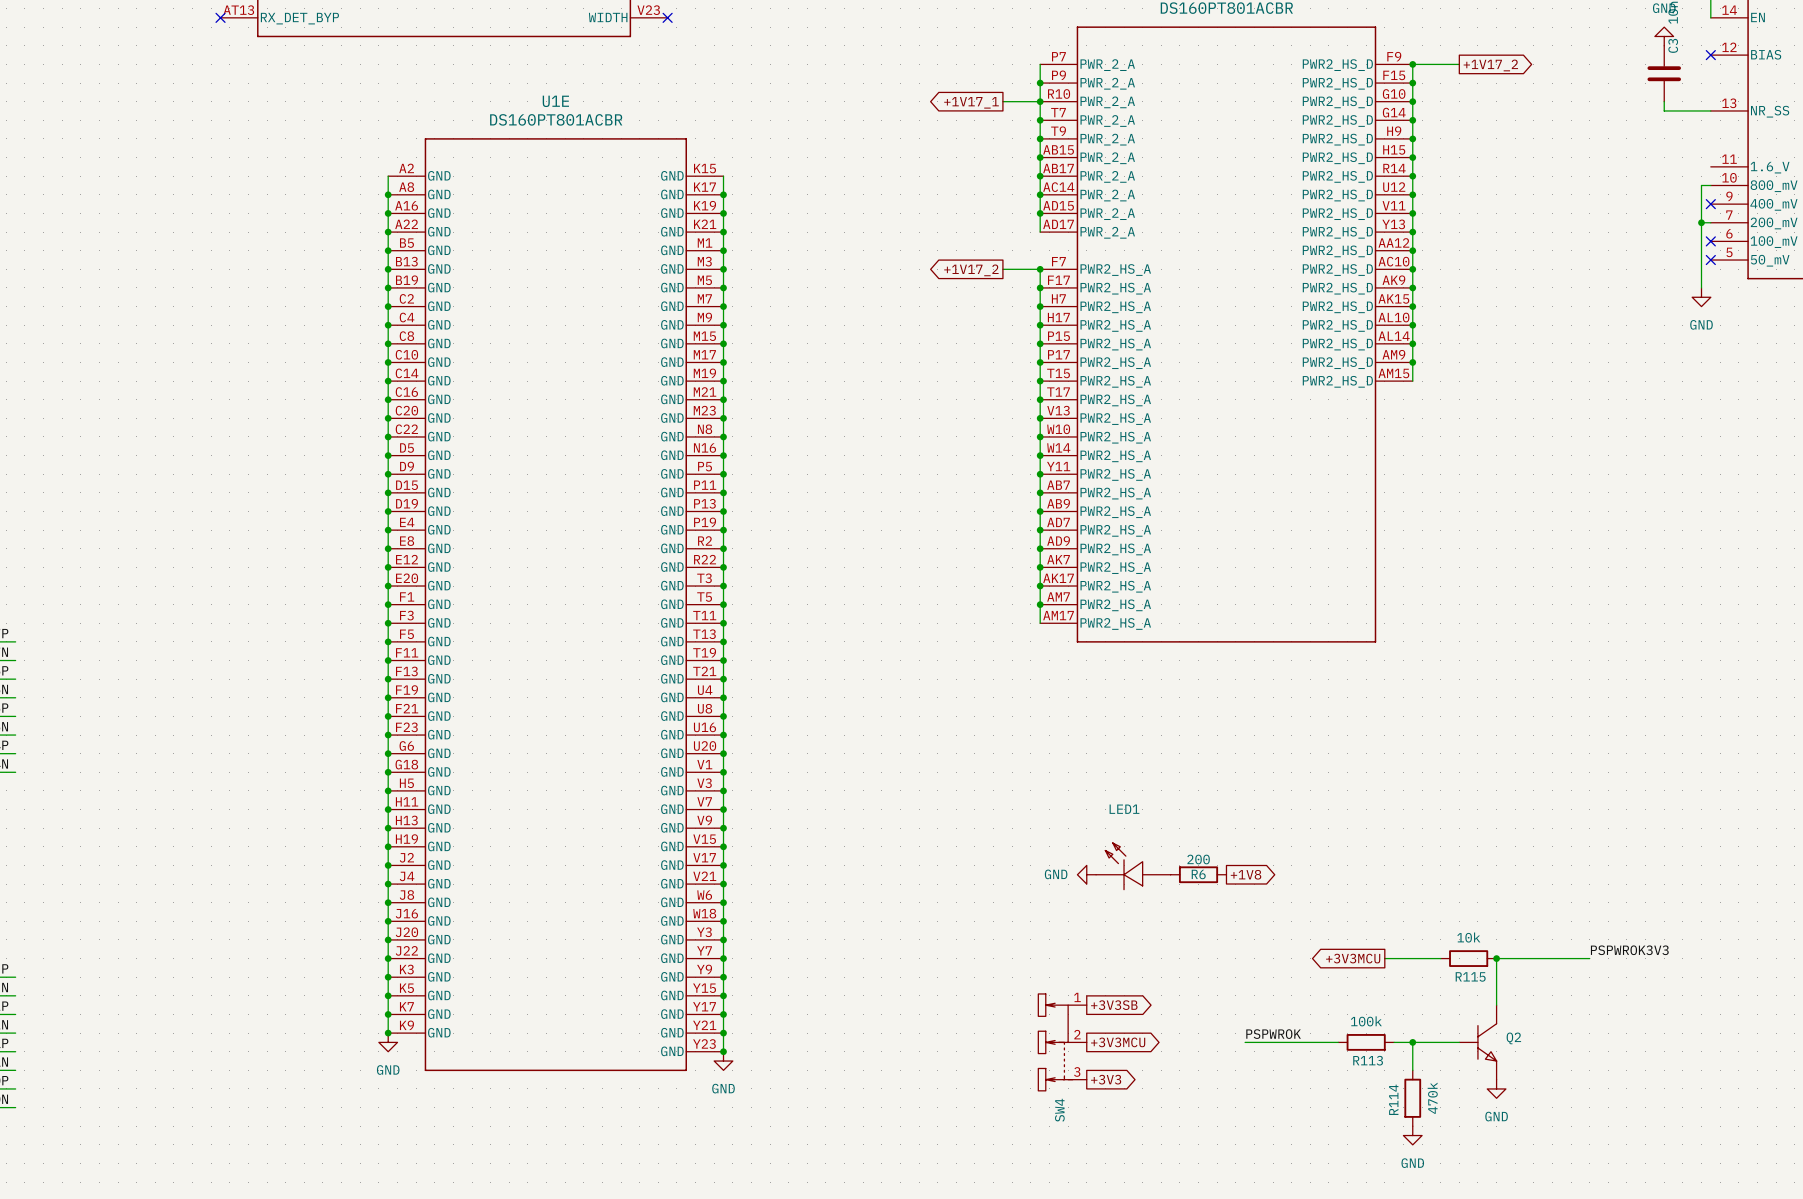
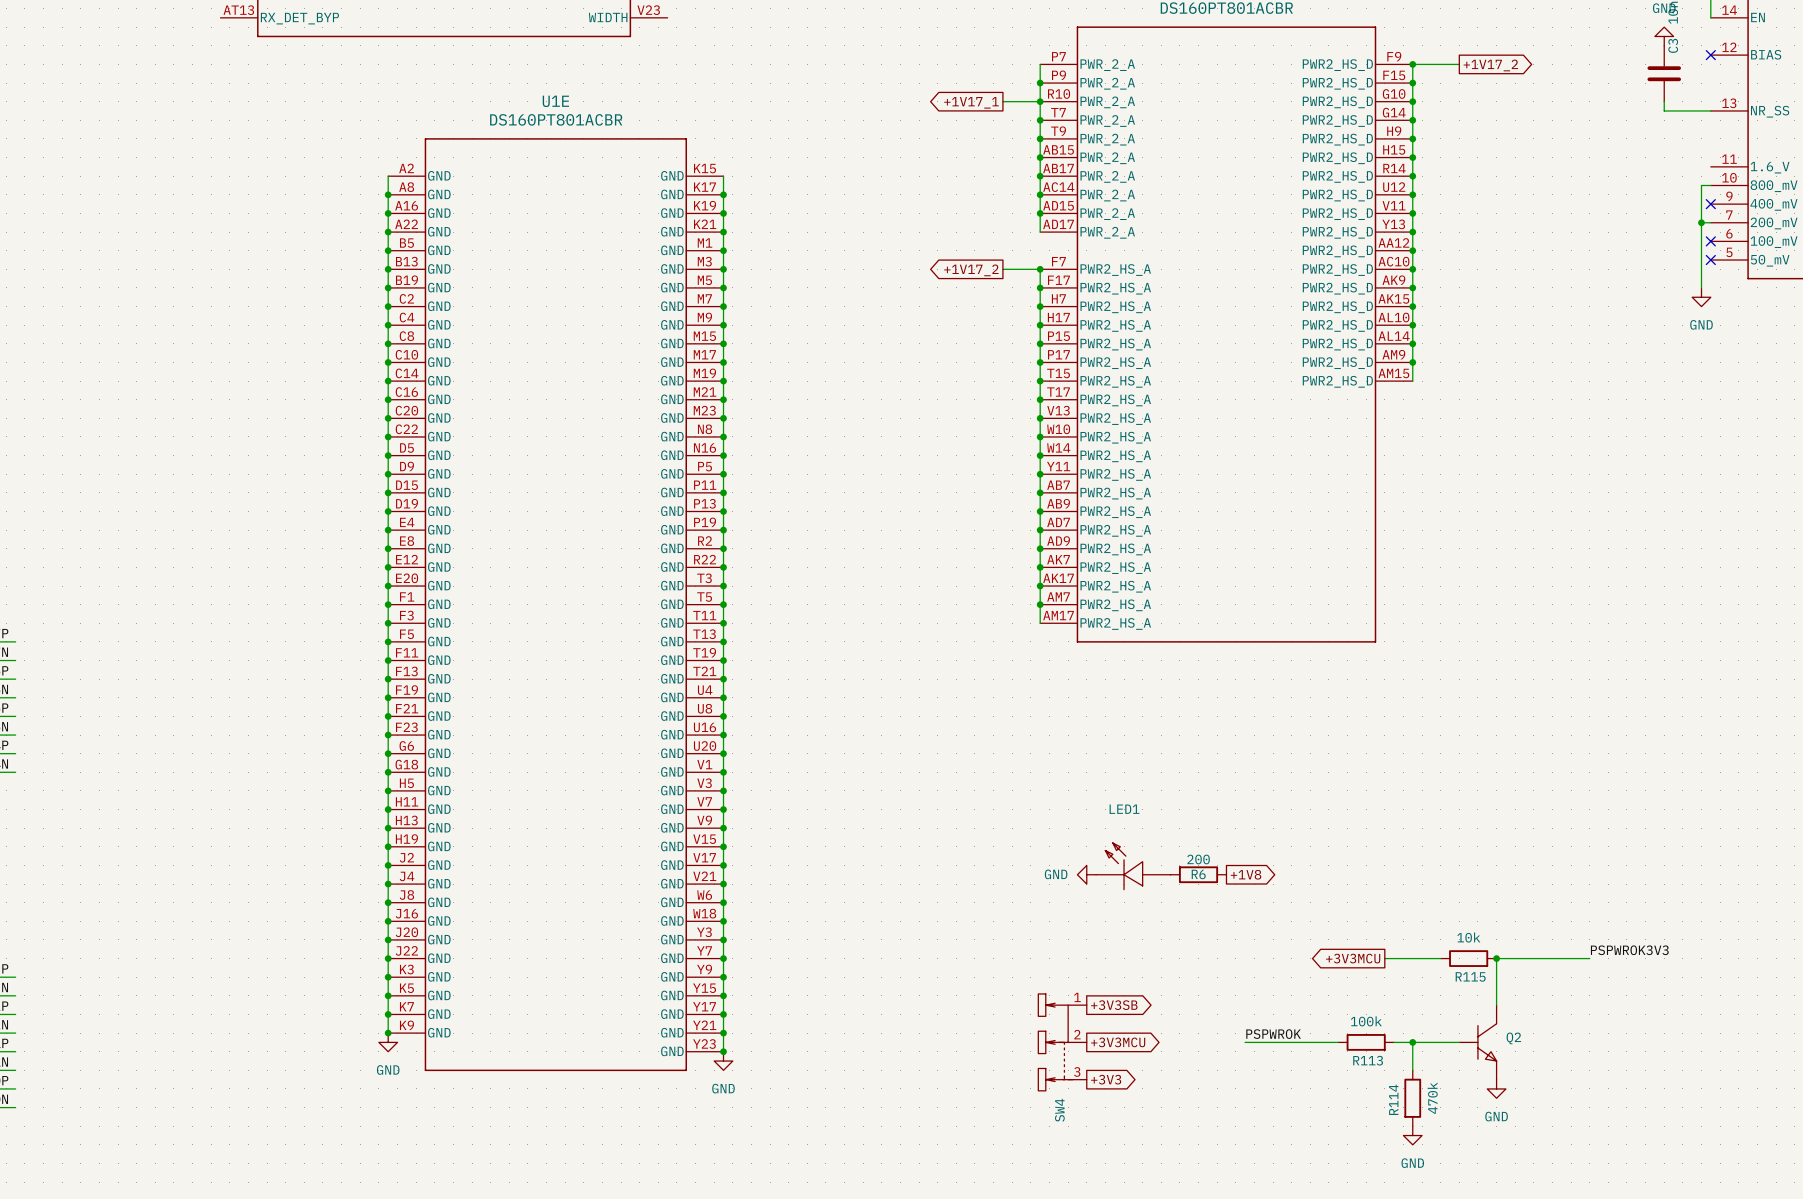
no-connect mark: (220, 17) -> none
no-connect mark: (667, 17) -> none

